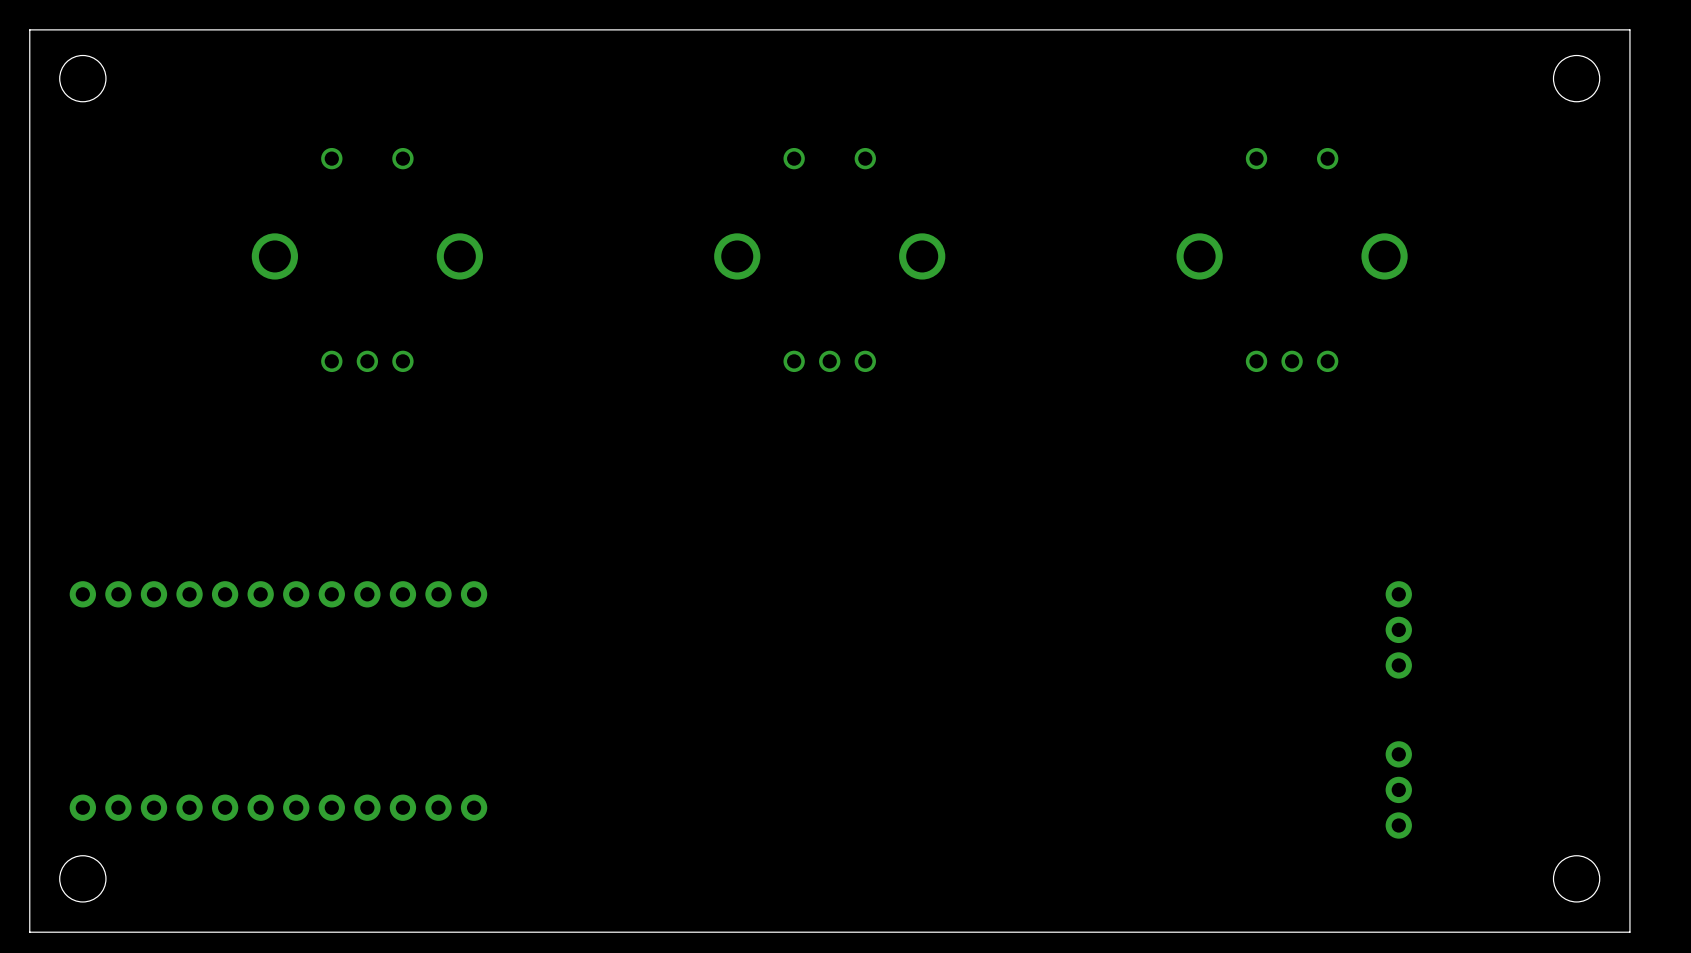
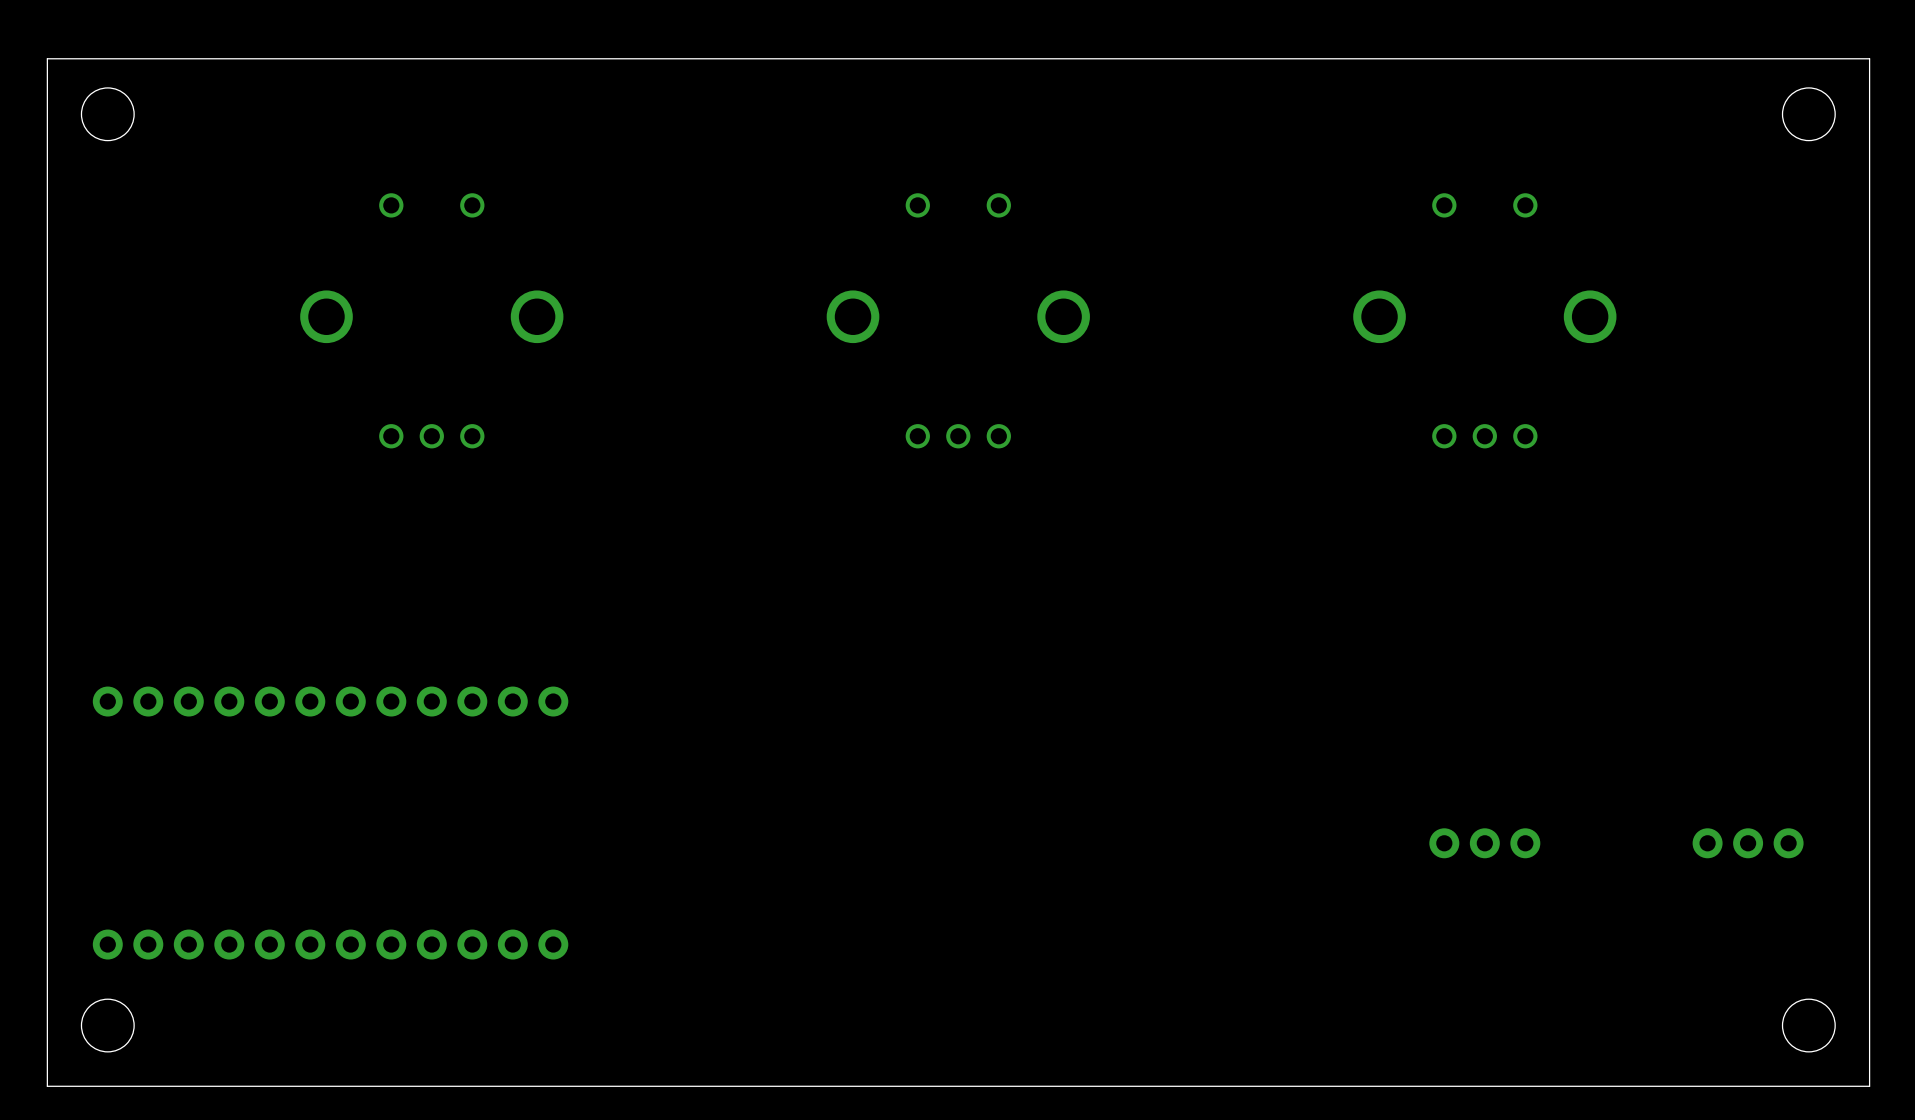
part: (1398, 629) -> none
part: none -> (1484, 843)
part: none -> (1748, 843)
part: (1398, 789) -> none

